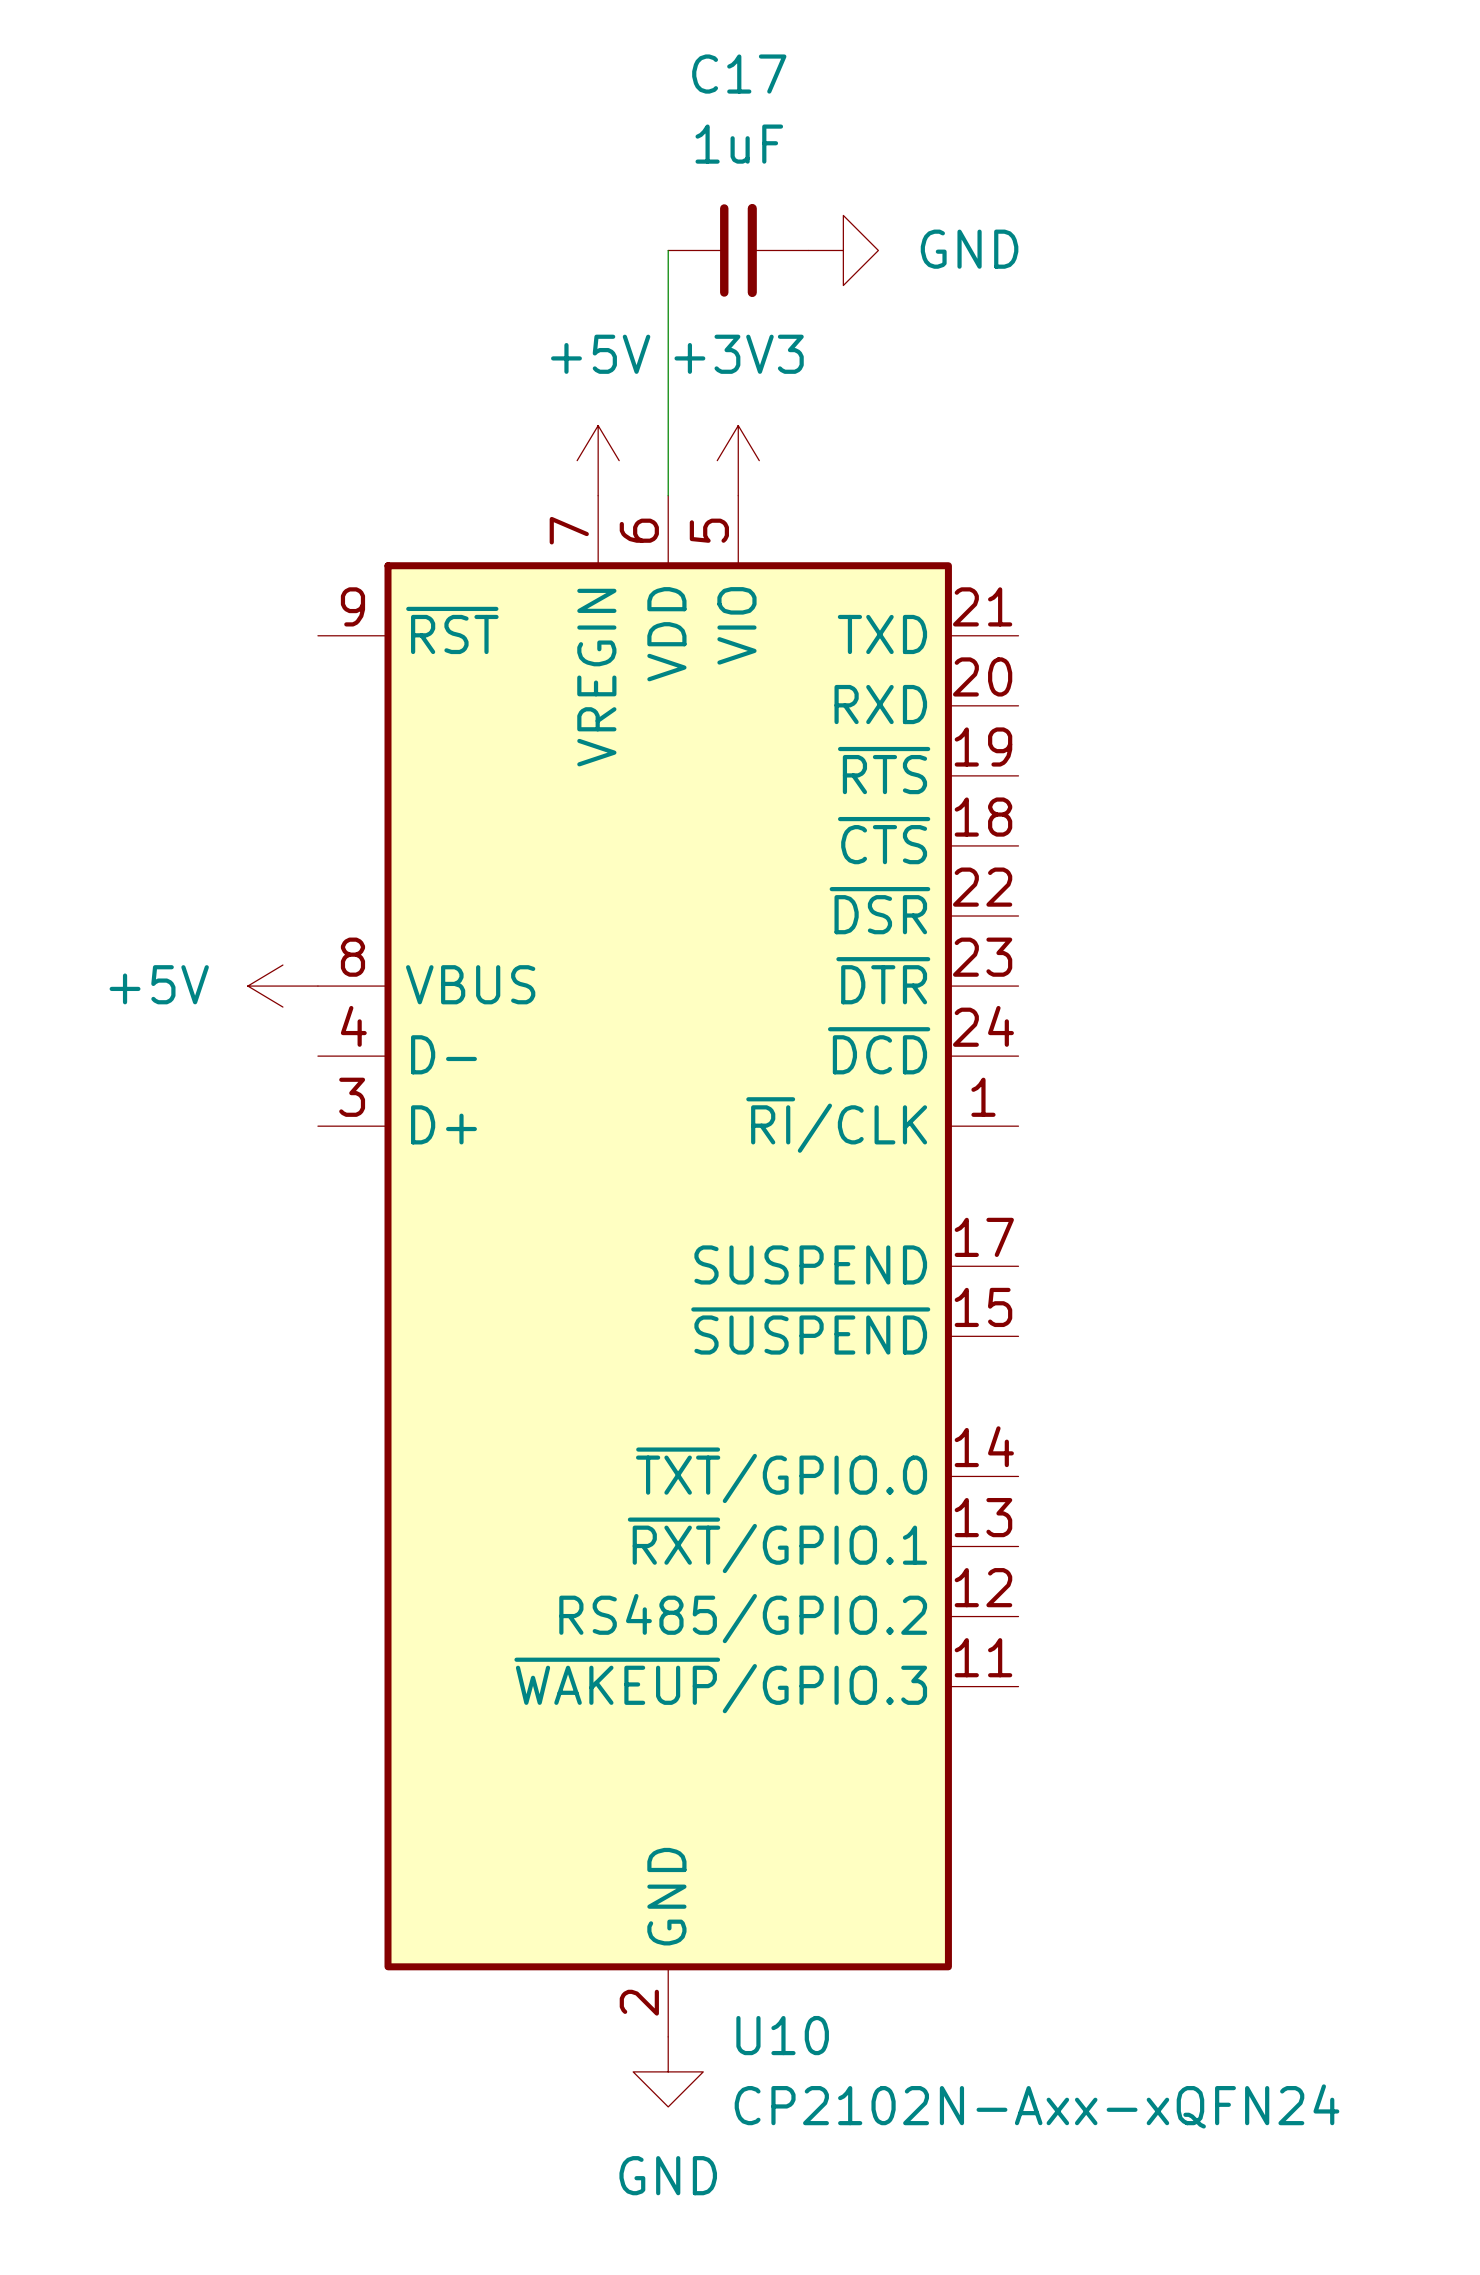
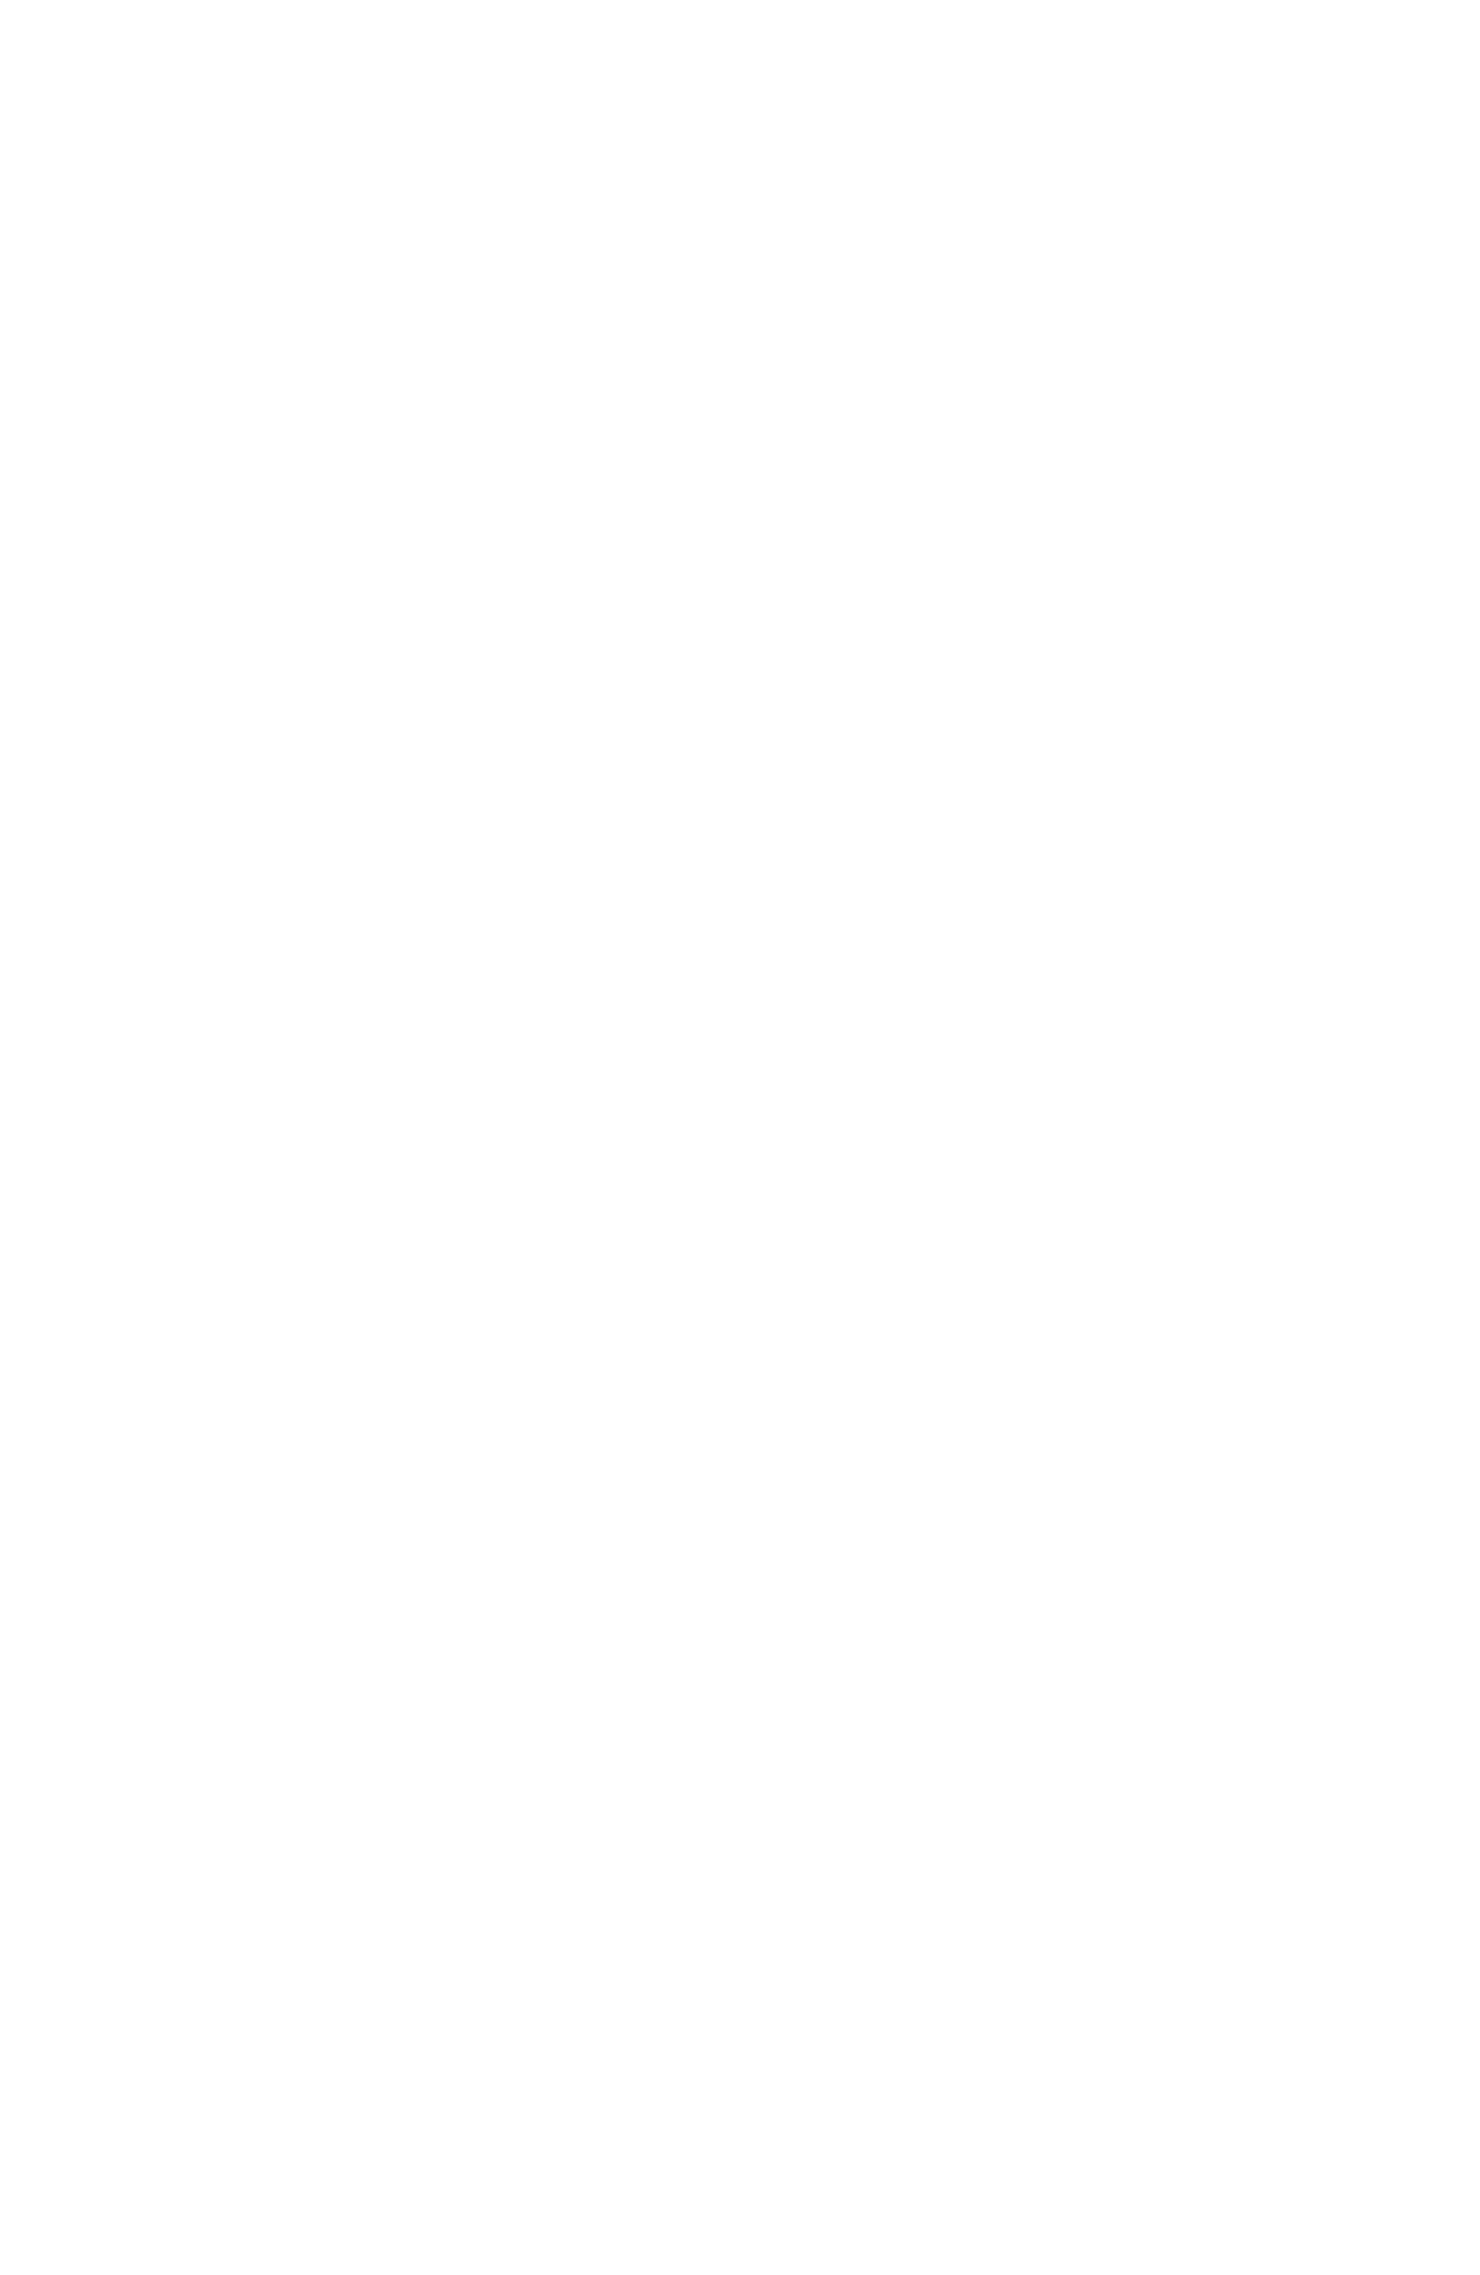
wire: (668, 250) (668, 495) -> none
C17: 1uF (738, 250) -> none
power symbol: GND (843, 250) -> none
power symbol: +5V (598, 460) -> none
power symbol: +3V3 (738, 460) -> none
power symbol: +5V (282, 986) -> none
U10: CP2102N-Axx-xQFN24 (668, 1266) -> none
power symbol: GND (668, 2071) -> none

